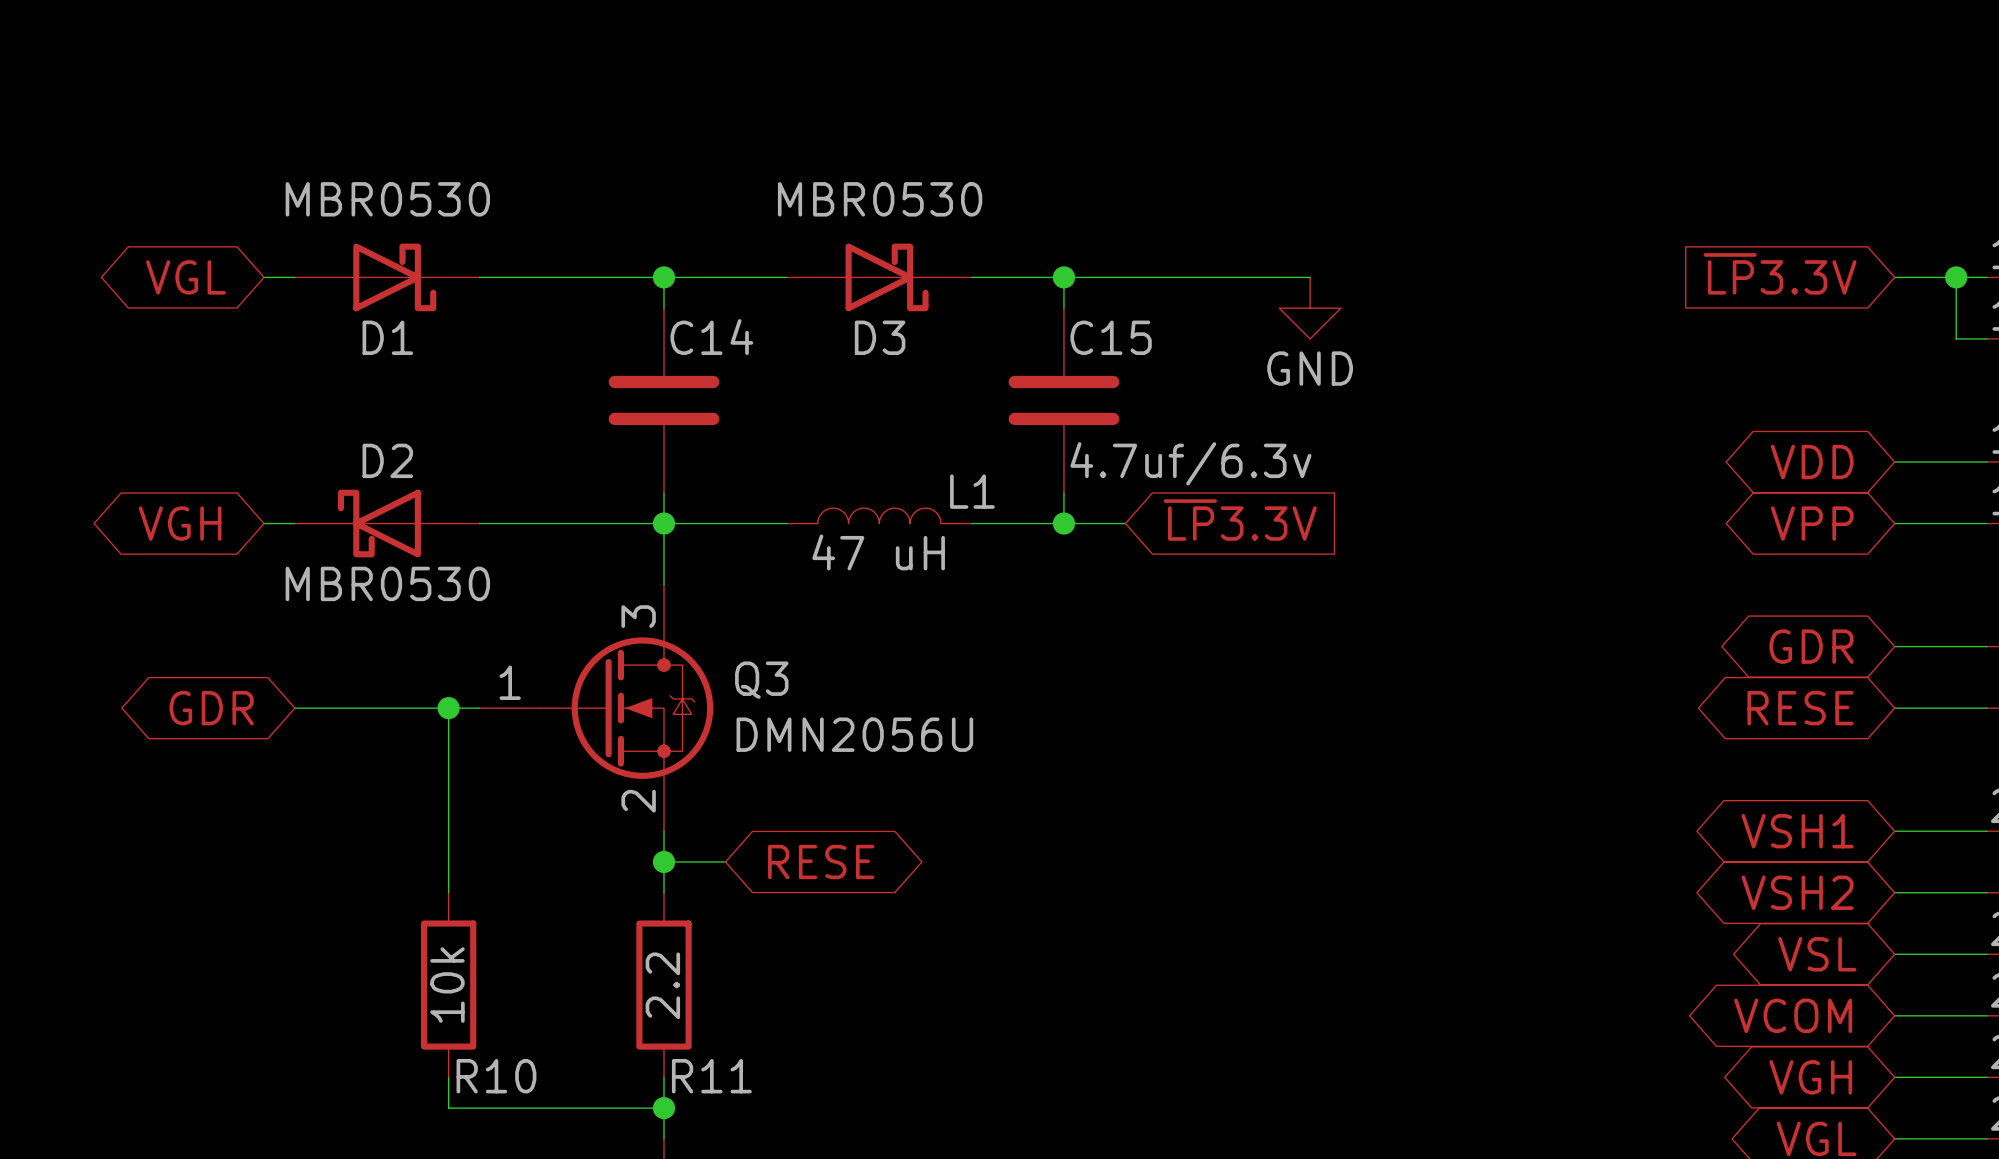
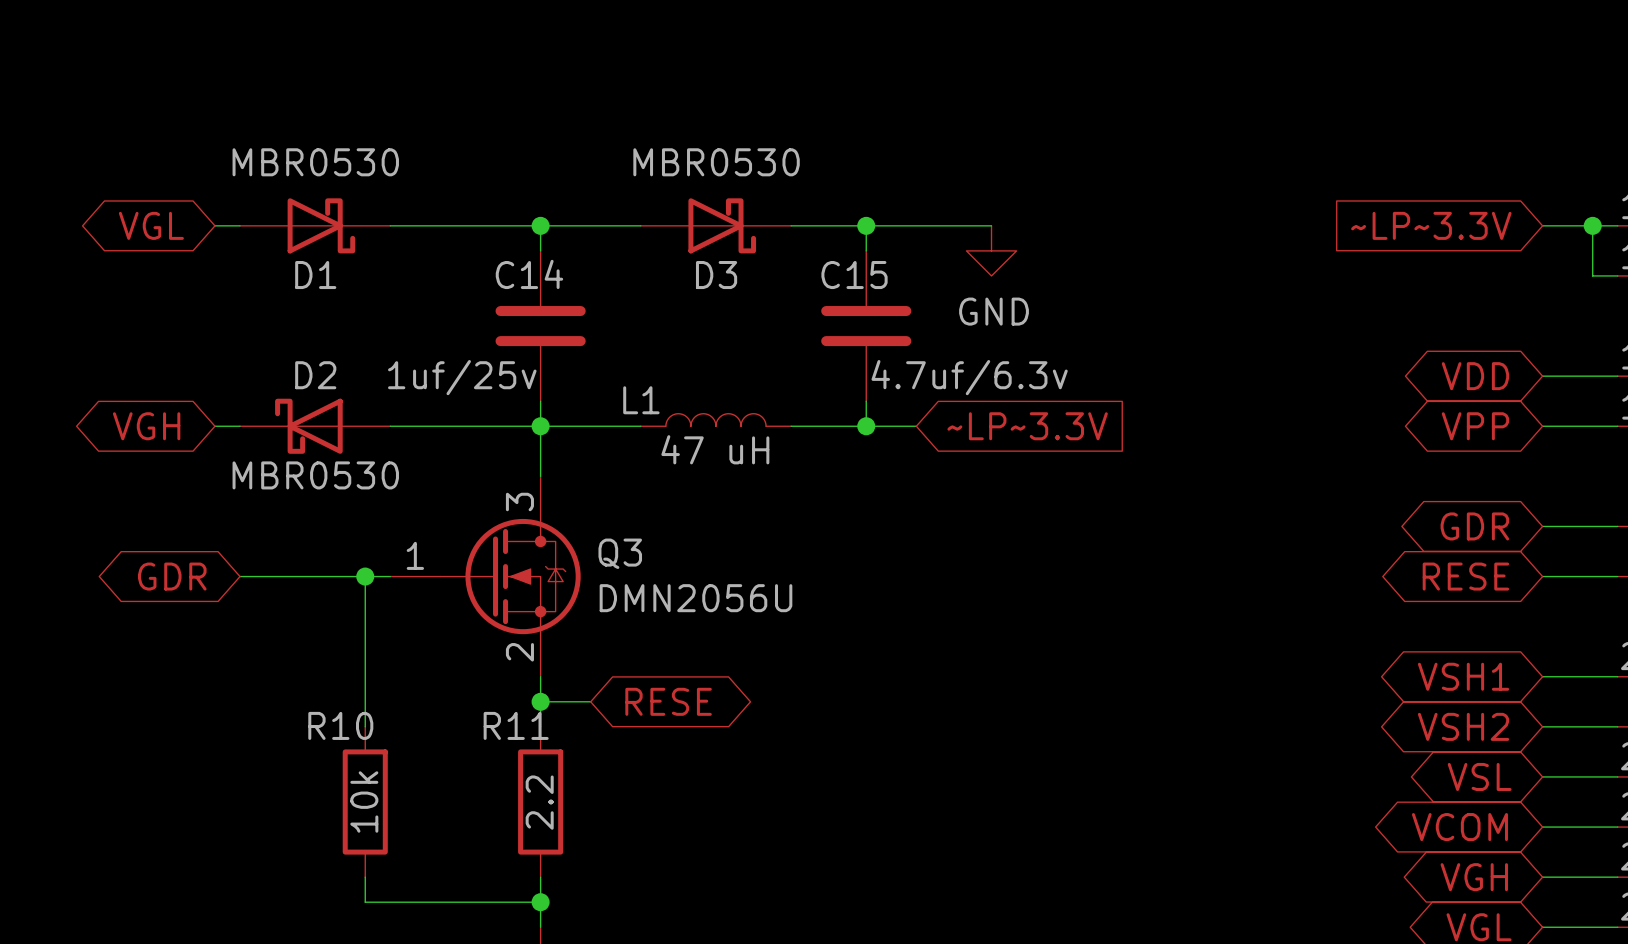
global label: ~{LP}3.3V (1780, 273) -> ~LP~3.3V (1431, 225)
wire: (1217, 277) (1310, 277) -> none
power symbol position: GND (1310, 308) -> GND (991, 250)
C14 name position: C14 (711, 337) -> C14 (529, 274)
C15 name position: C15 (1111, 337) -> C15 (854, 275)
power symbol text position: GND (1310, 368) -> GND (994, 311)
C14 value: none -> 1uf/25v (462, 377)
L1 name position: L1 (972, 491) -> L1 (641, 400)
global label: ~{LP}3.3V (1240, 520) -> ~LP~3.3V (1027, 426)
R10 name position: R10 (496, 1076) -> R10 (340, 725)
R11 name position: R11 (711, 1076) -> R11 (516, 725)

